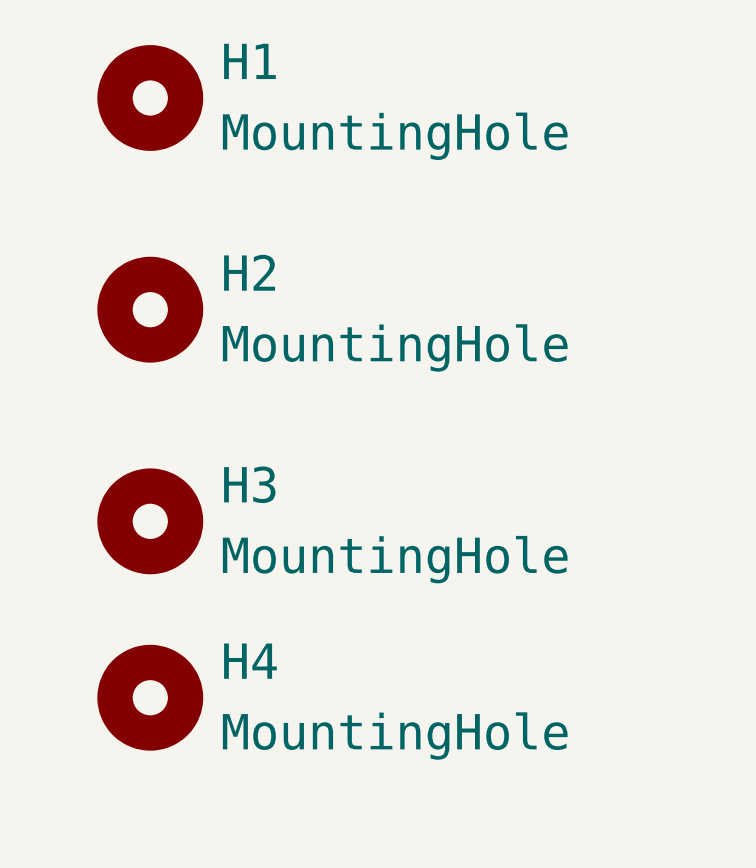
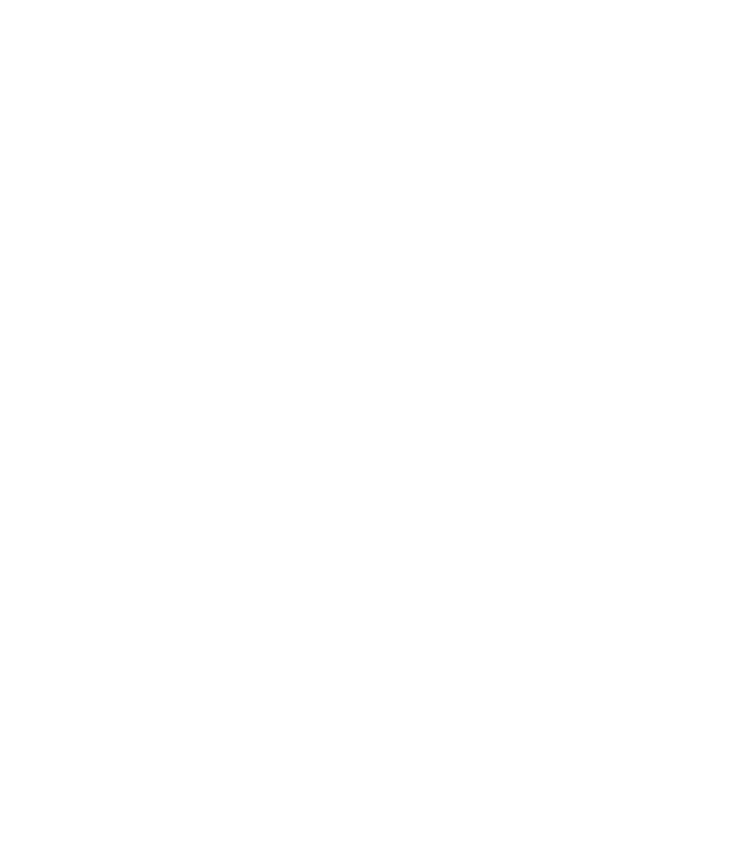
H1: MountingHole (150, 98) -> none
H2: MountingHole (150, 309) -> none
H3: MountingHole (150, 521) -> none
H4: MountingHole (150, 697) -> none

